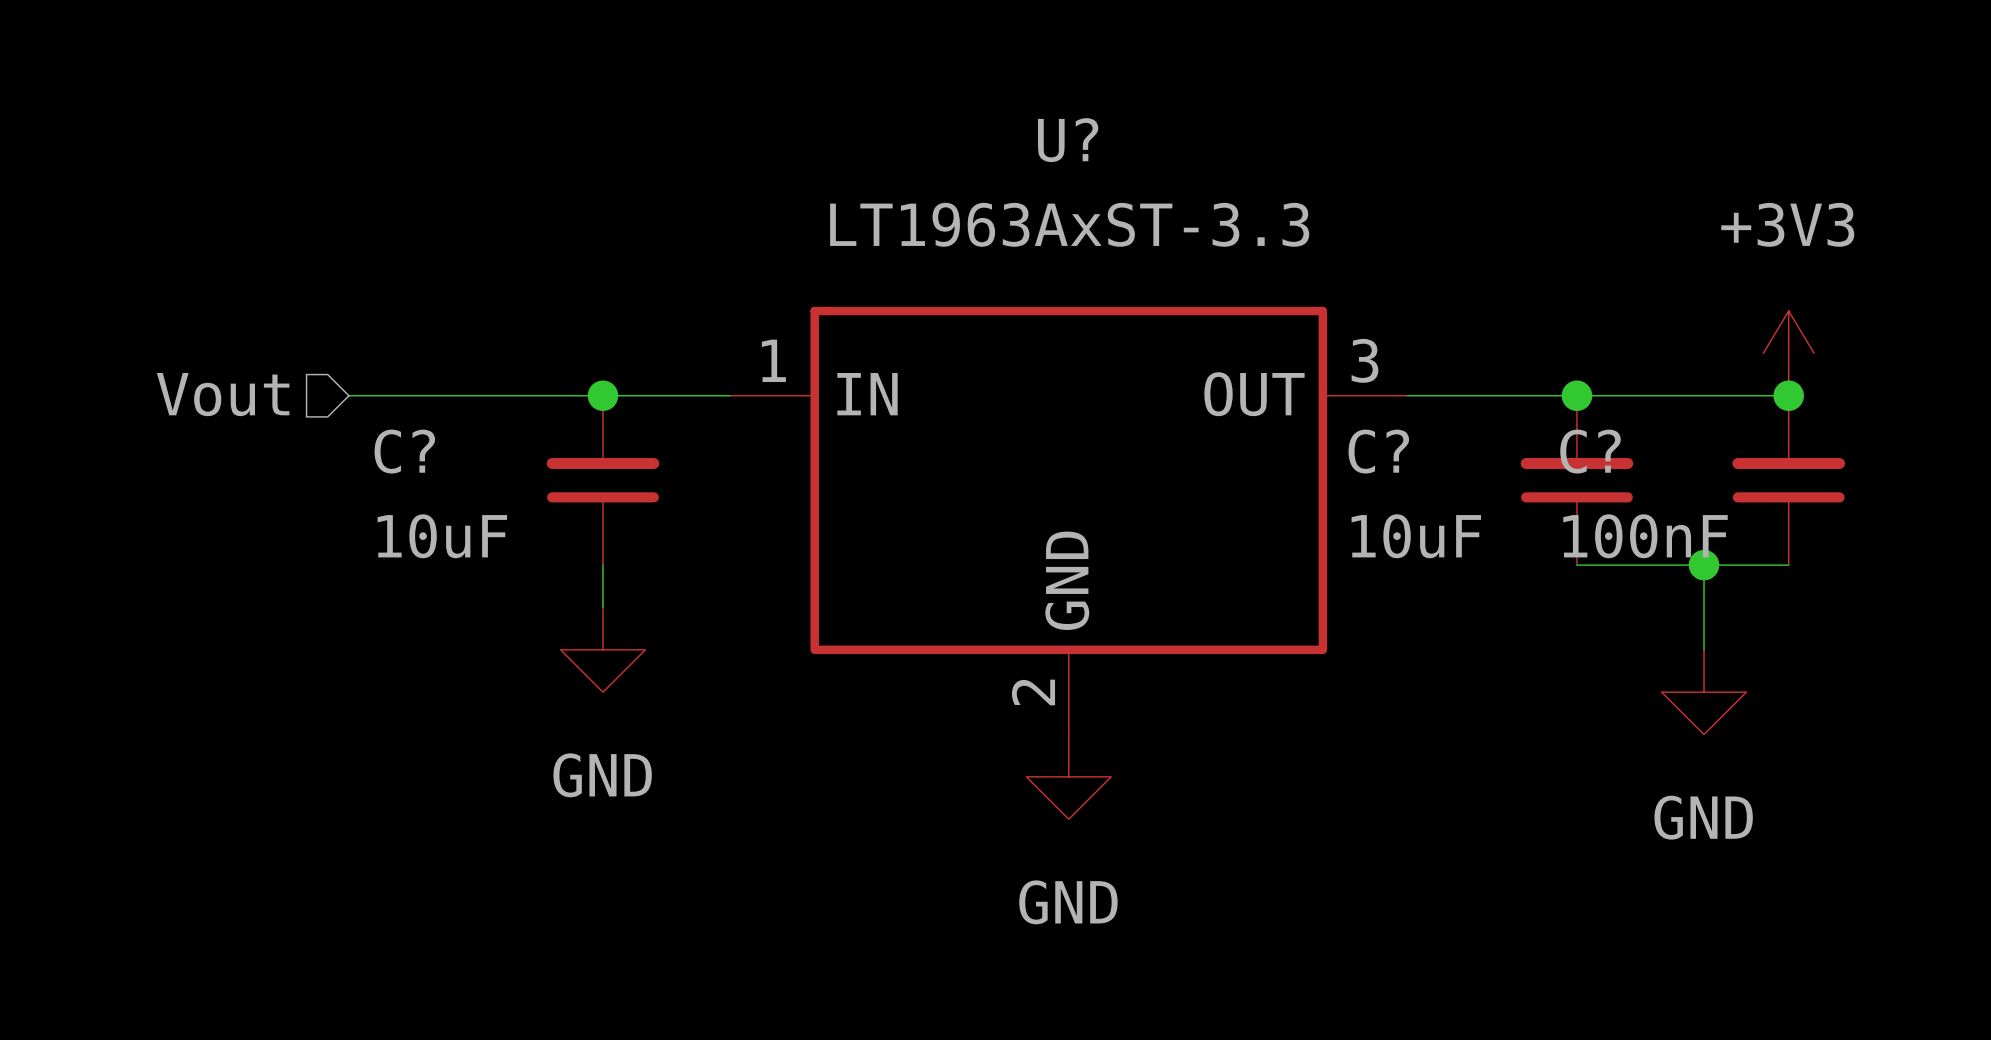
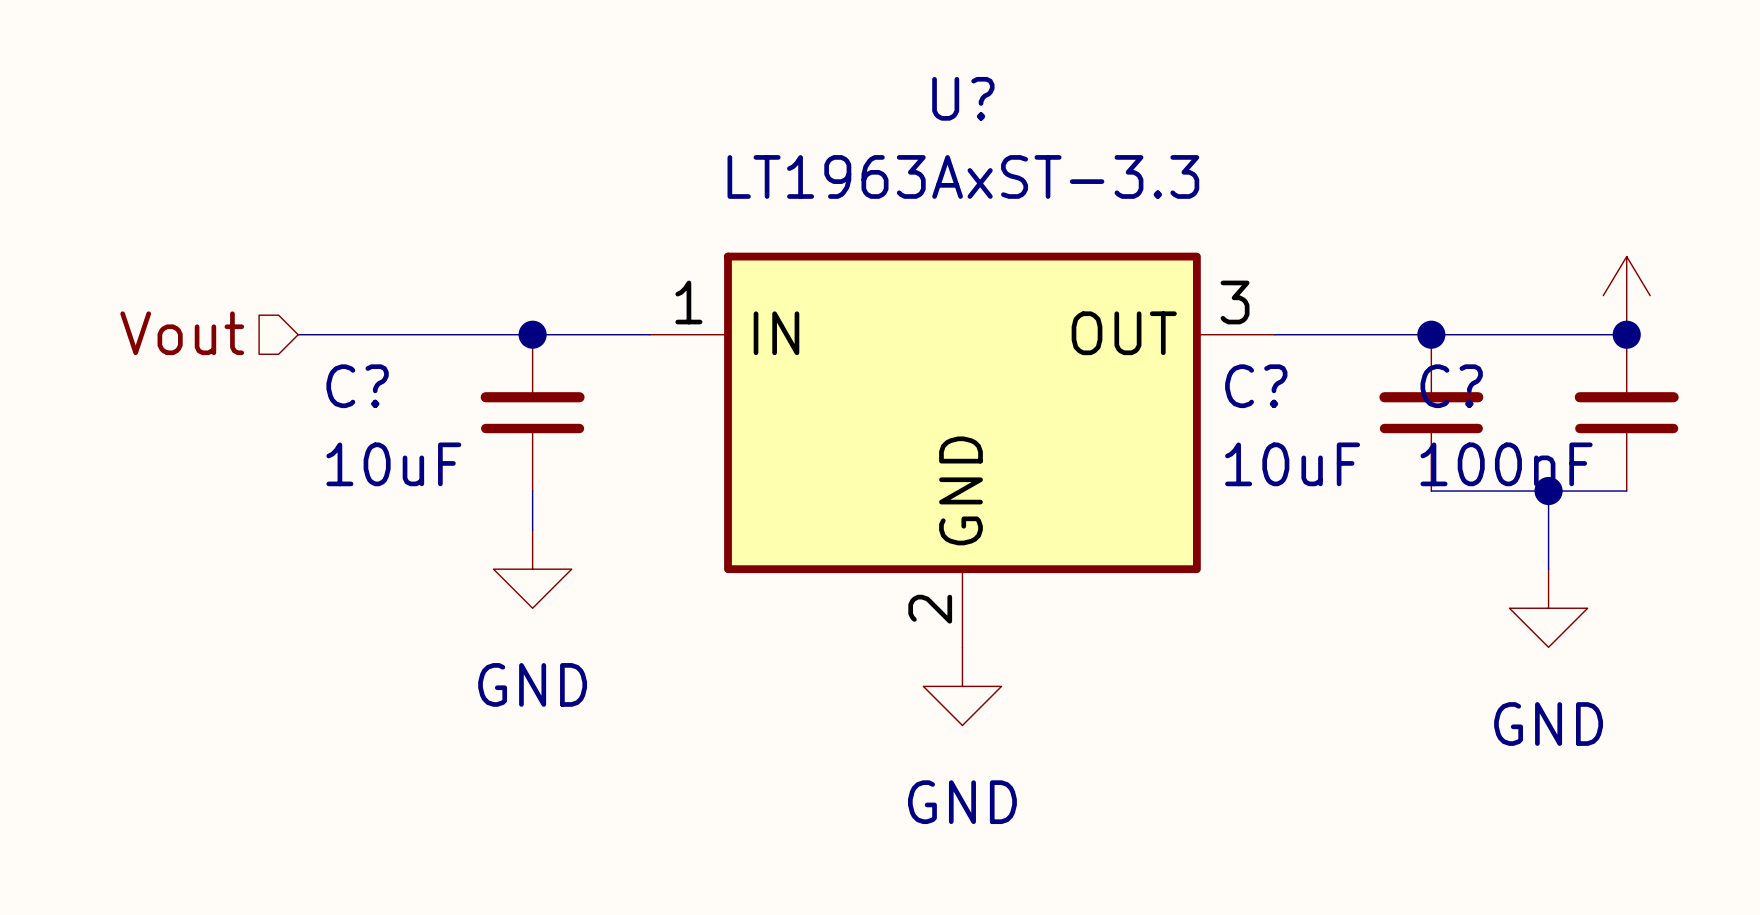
power symbol text: +3V3 (1787, 224) -> none

